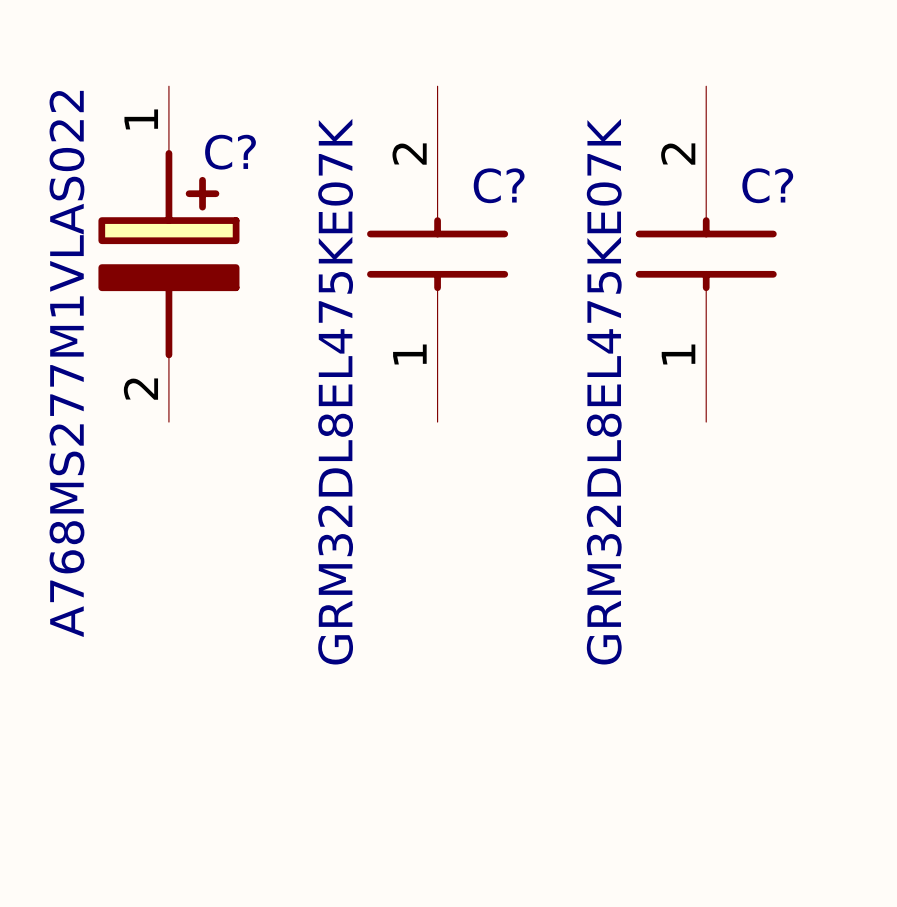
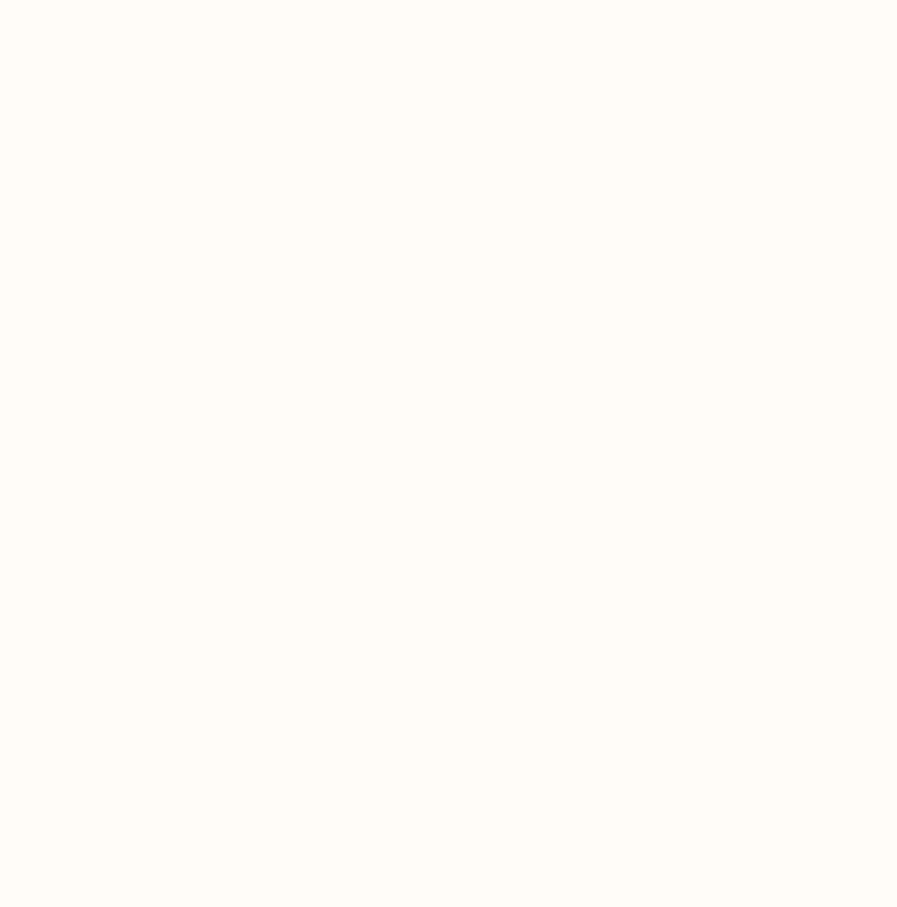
C?: A768MS277M1VLAS022 (168, 254) -> none
C?: GRM32DL8EL475KE07K (437, 254) -> none
C?: GRM32DL8EL475KE07K (706, 254) -> none

